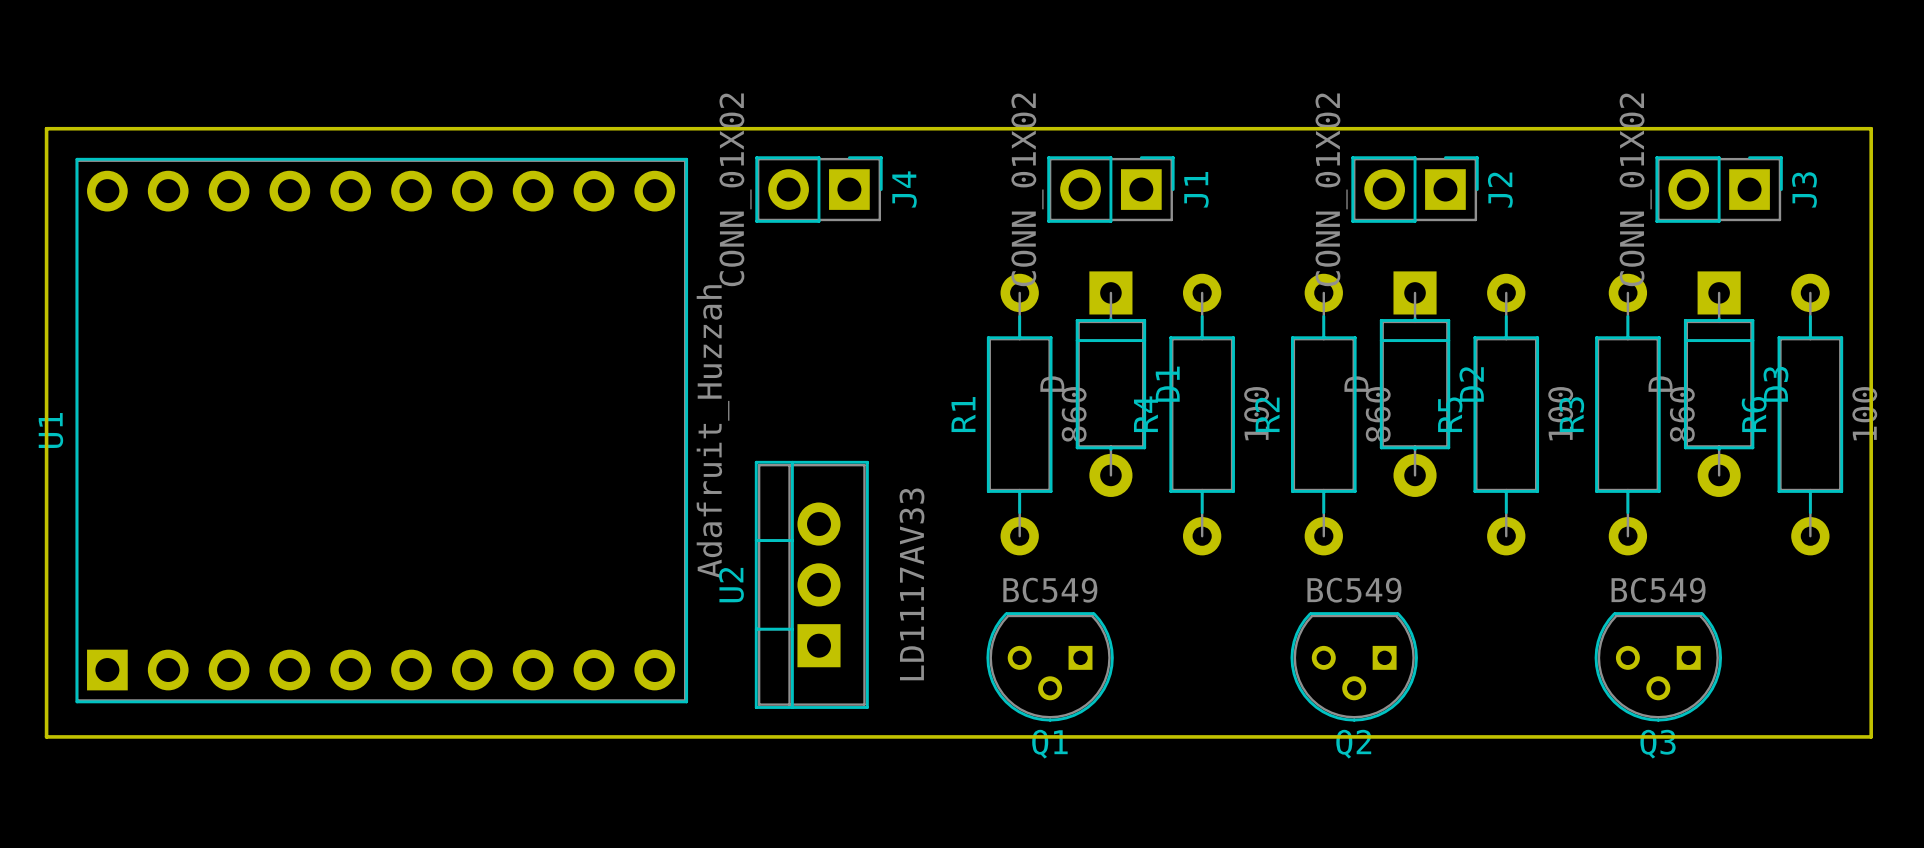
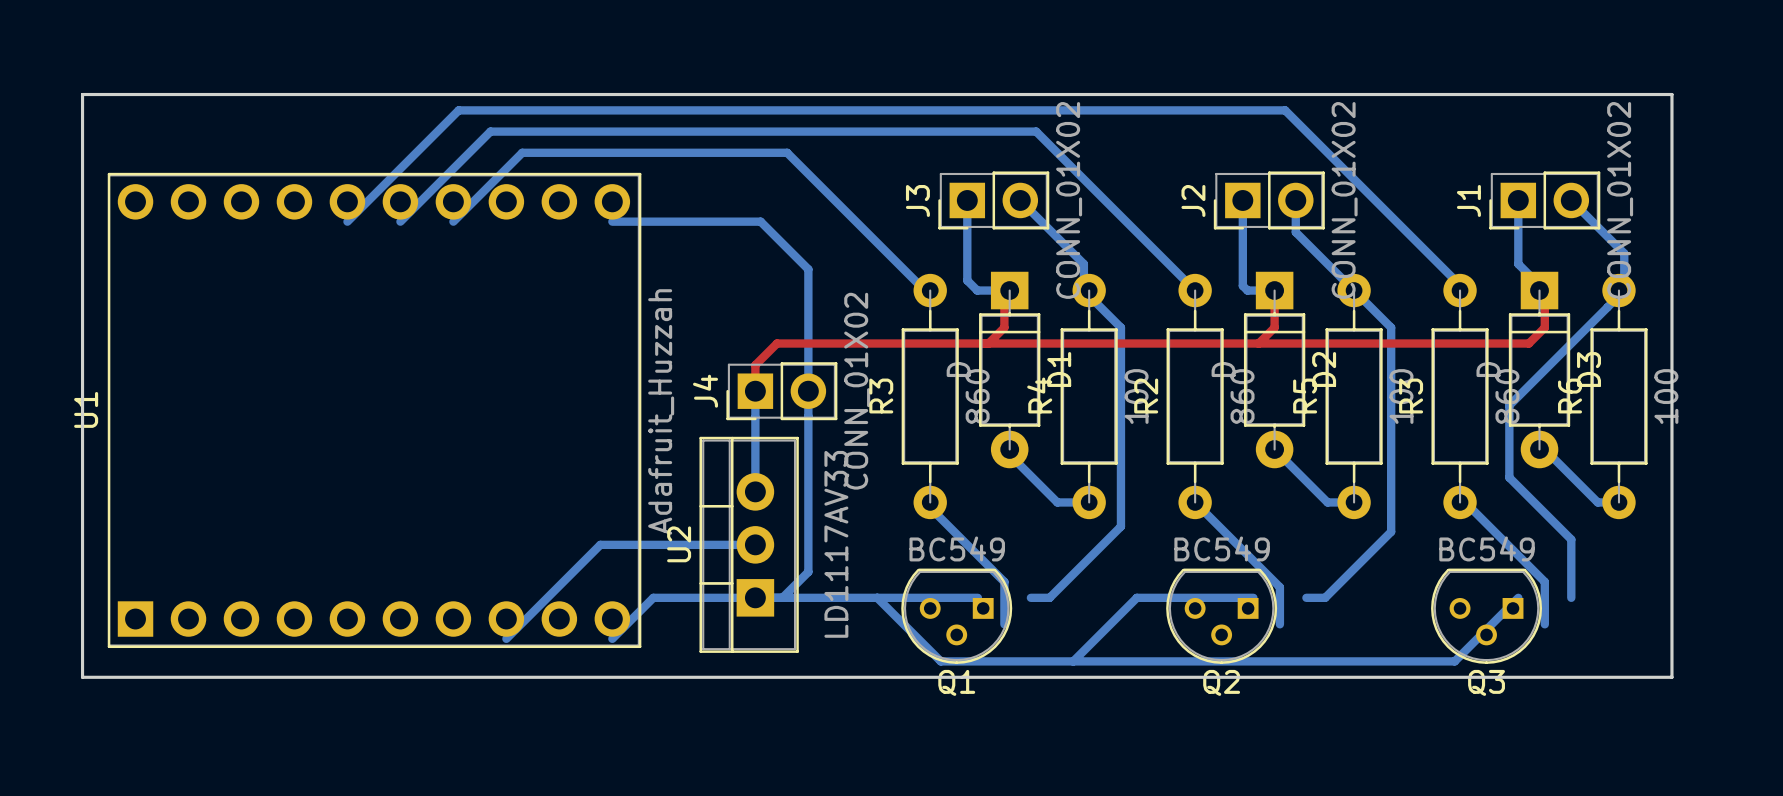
board edge: (46, 128) (1871, 128) -> (82, 147) (82, 94) (1671, 94) (1671, 147)
J4 rotation: 0° (818, 189) -> 180° (781, 391)
J4 position: (818, 189) -> (781, 391)
bottom track: none -> (967, 200) (967, 280) (977, 290) (1004, 290)
J1 rotation: 0° (1110, 189) -> 180° (1544, 200)
J1 position: (1110, 189) -> (1544, 200)
bottom track: none -> (1020, 200) (1083, 264) (1083, 290) (1120, 327) (1120, 526) (1049, 597) (1030, 597)
bottom track: none -> (1242, 200) (1242, 285) (1247, 290) (1274, 290)
J2 rotation: 0° (1415, 189) -> 180° (1269, 200)
bottom track: none -> (1295, 200) (1295, 232) (1391, 327) (1391, 531) (1325, 597) (1306, 597)
bottom track: none -> (1518, 200) (1518, 264) (1544, 290)
J3 rotation: 0° (1719, 189) -> 180° (993, 200)
J3 position: (1719, 189) -> (993, 200)
bottom track: none -> (1571, 200) (1624, 253) (1624, 290) (1509, 405) (1509, 477) (1571, 539) (1571, 597)
bottom track: none -> (347, 221) (458, 110) (1285, 110) (1465, 290)
bottom track: none -> (400, 221) (490, 131) (1036, 131) (1195, 290)
bottom track: none -> (453, 221) (522, 152) (787, 152) (924, 290)
bottom track: none -> (612, 221) (760, 221) (808, 269) (808, 571) (782, 597)
top track: none -> (1004, 290) (1004, 327) (988, 343)
top track: none -> (1274, 290) (1274, 327) (1258, 343)
top track: none -> (1544, 290) (1544, 327) (1528, 343) (777, 343) (755, 365) (755, 391)
bottom track: none -> (755, 391) (755, 491)
R1 name: R1 (963, 414) -> R3 (881, 396)
bottom track: none -> (1004, 449) (1057, 502) (1083, 502)
bottom track: none -> (1274, 449) (1327, 502) (1354, 502)
bottom track: none -> (1544, 449) (1597, 502) (1624, 502)
bottom track: none -> (924, 502) (1004, 581) (1004, 624)
bottom track: none -> (1195, 502) (1279, 587) (1279, 624)
bottom track: none -> (1465, 502) (1544, 581) (1544, 624)
bottom track: none -> (755, 544) (600, 544) (506, 638)
bottom track: none -> (877, 597) (940, 661) (1454, 661) (1518, 597)
bottom track: none -> (977, 597) (653, 597) (612, 638)
bottom track: none -> (1253, 597) (1136, 597) (1073, 661)

